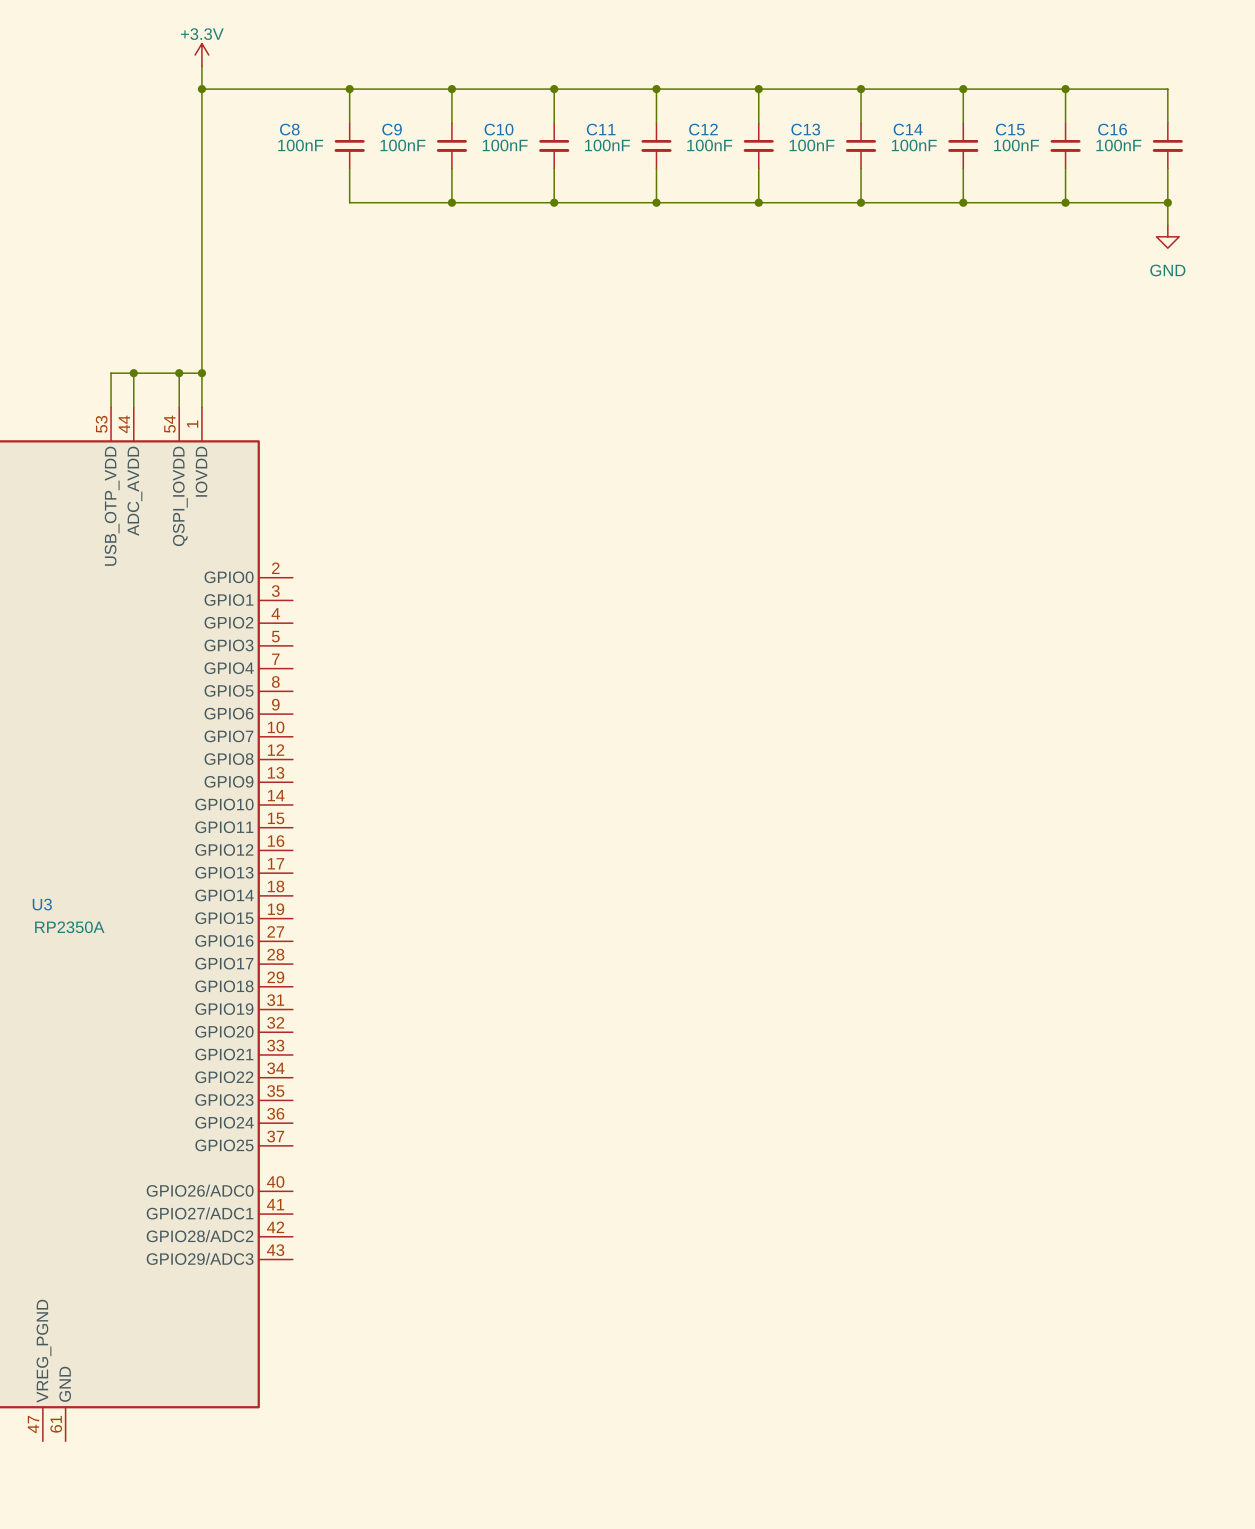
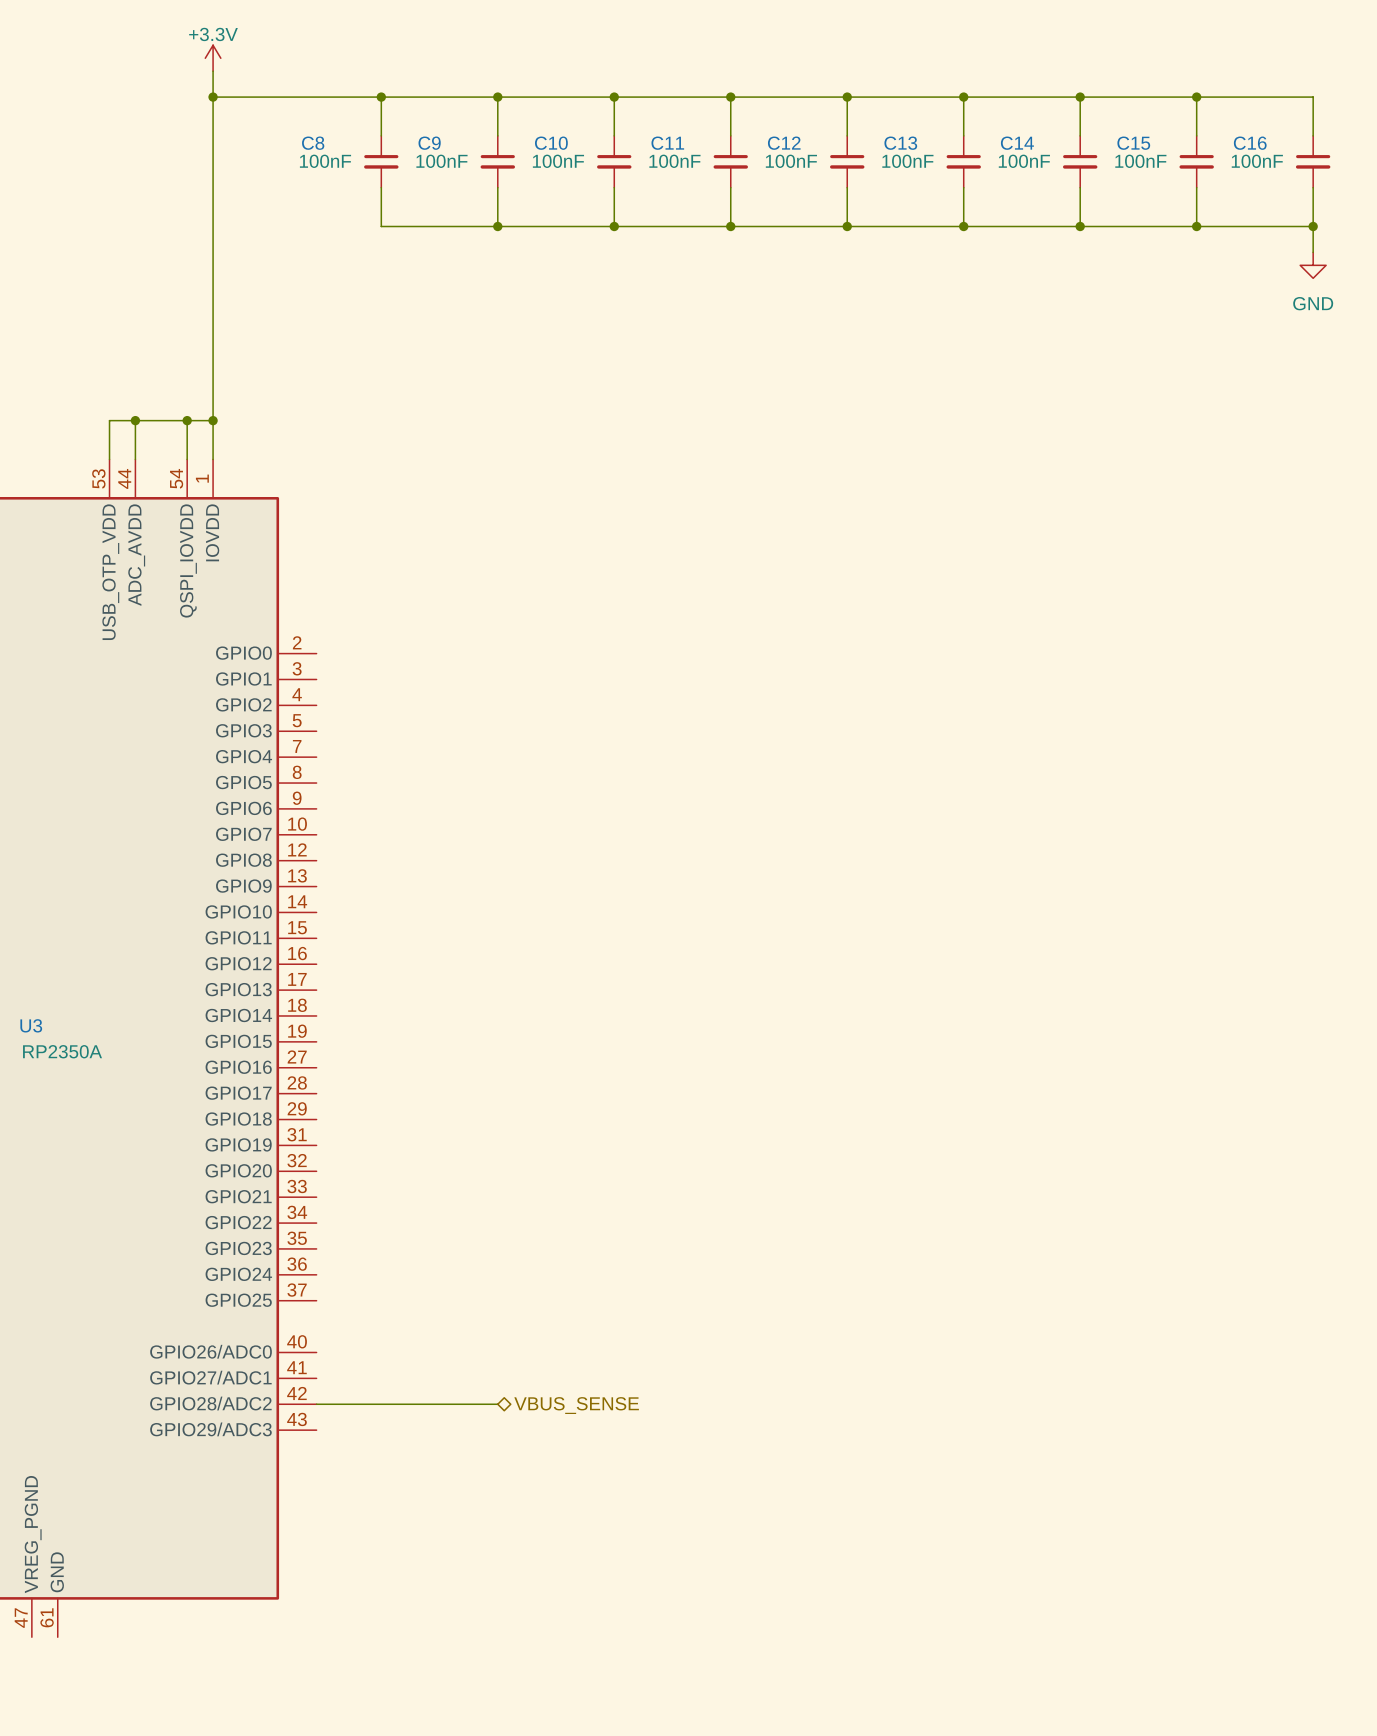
wire: none -> (316, 1404) (497, 1404)
hierarchical label: none -> VBUS_SENSE (576, 1405)

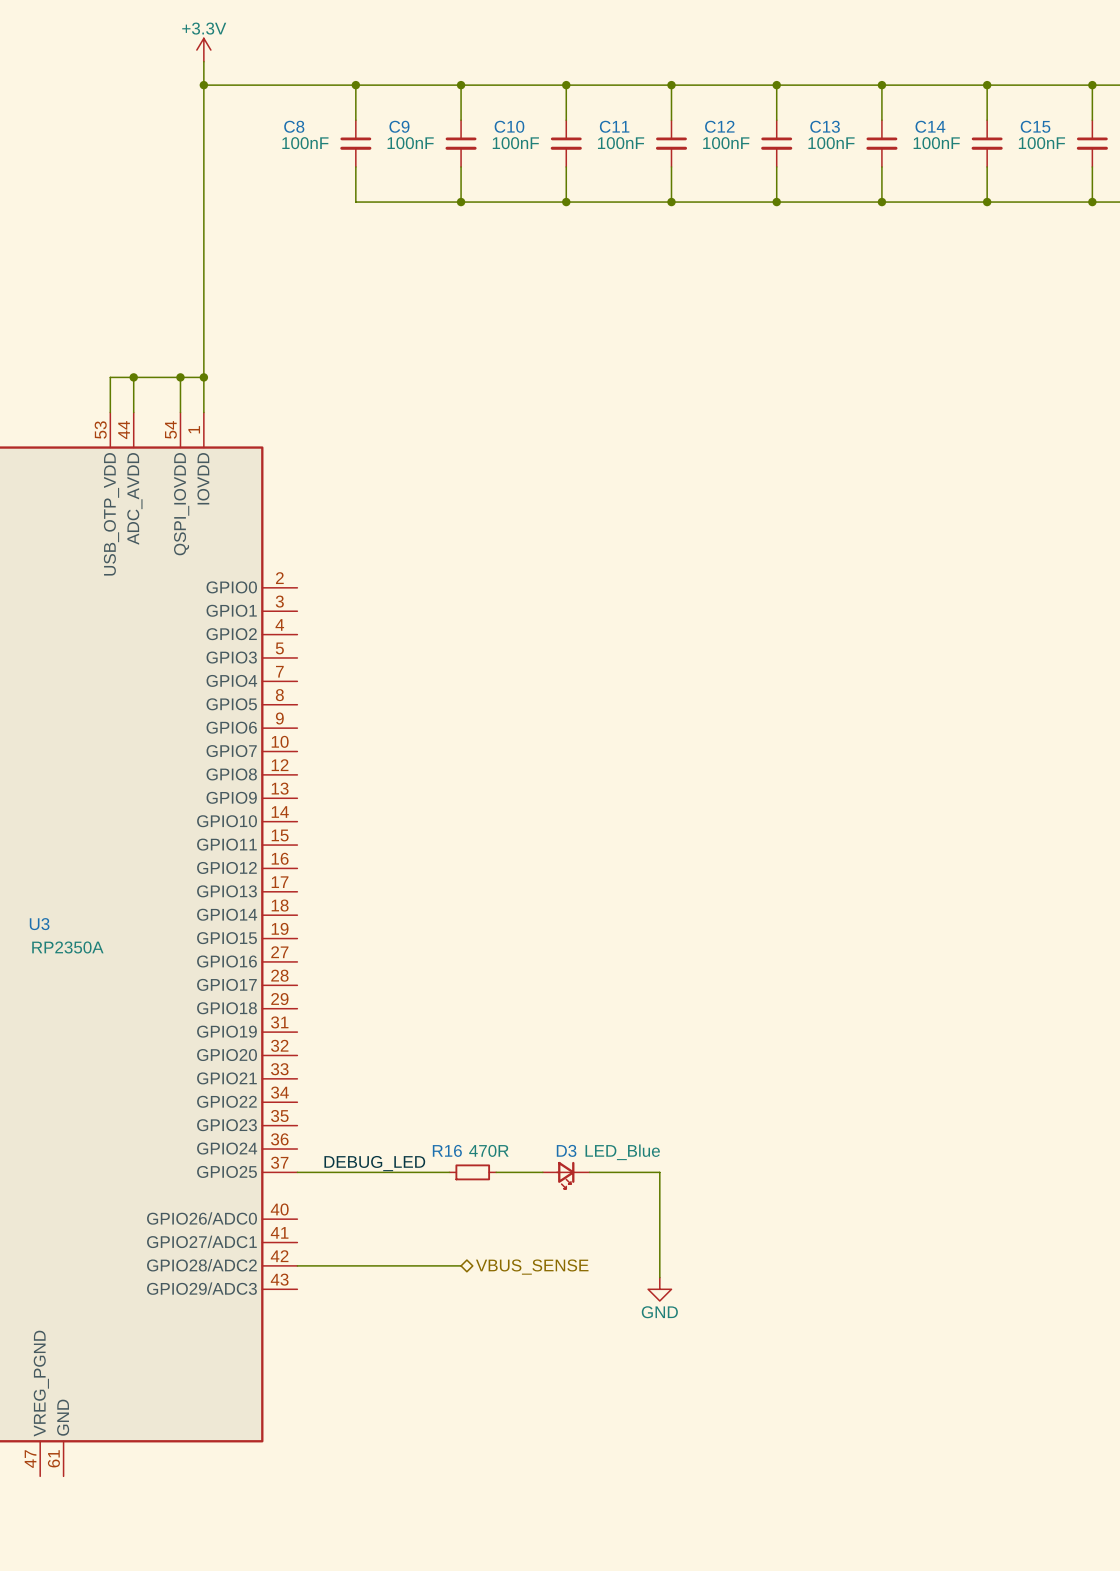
label: none -> DEBUG_LED (374, 1163)
wire: none -> (297, 1172) (449, 1172)
R16: none -> 470R (472, 1172)
wire: none -> (496, 1172) (542, 1172)
wire: none -> (589, 1172) (659, 1172) (659, 1277)
D3: none -> LED_Blue (566, 1175)
power symbol: none -> GND (659, 1289)

